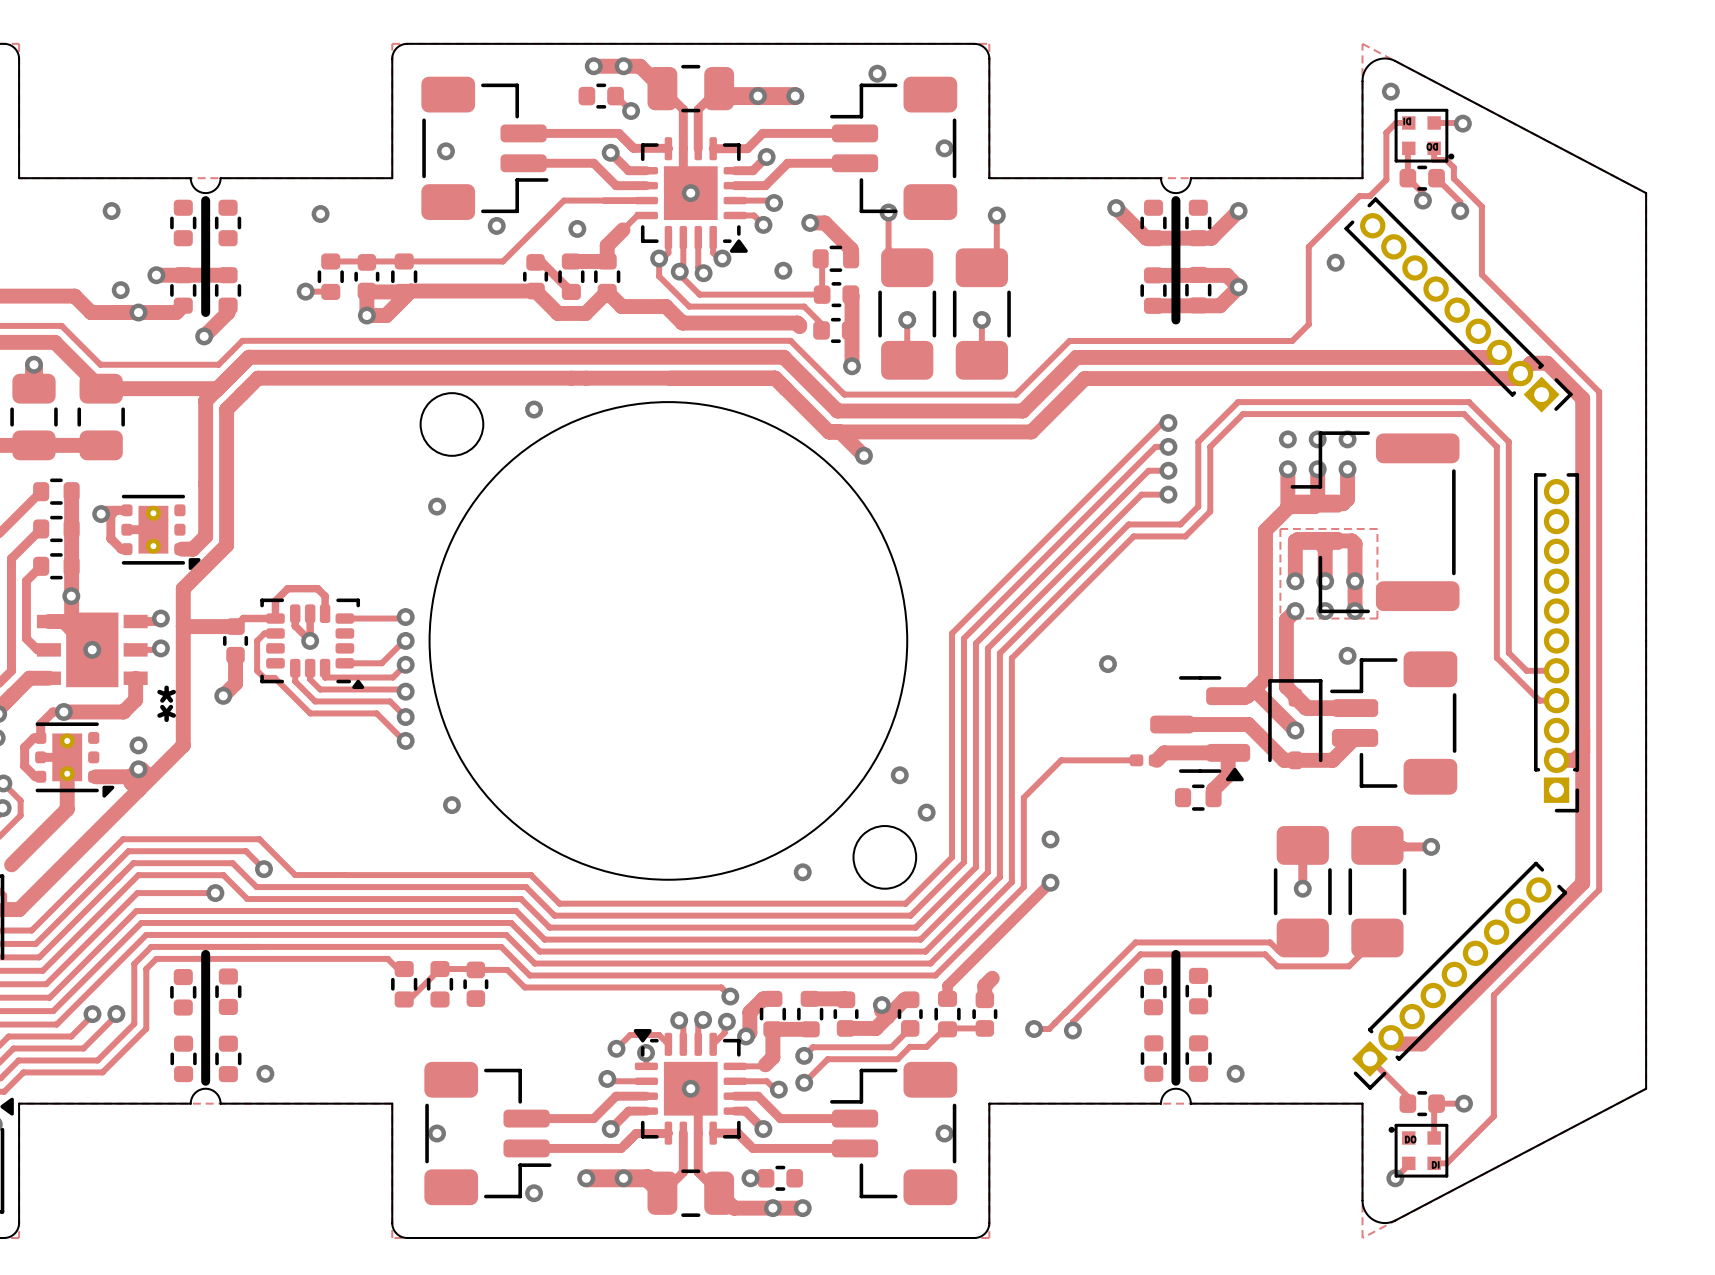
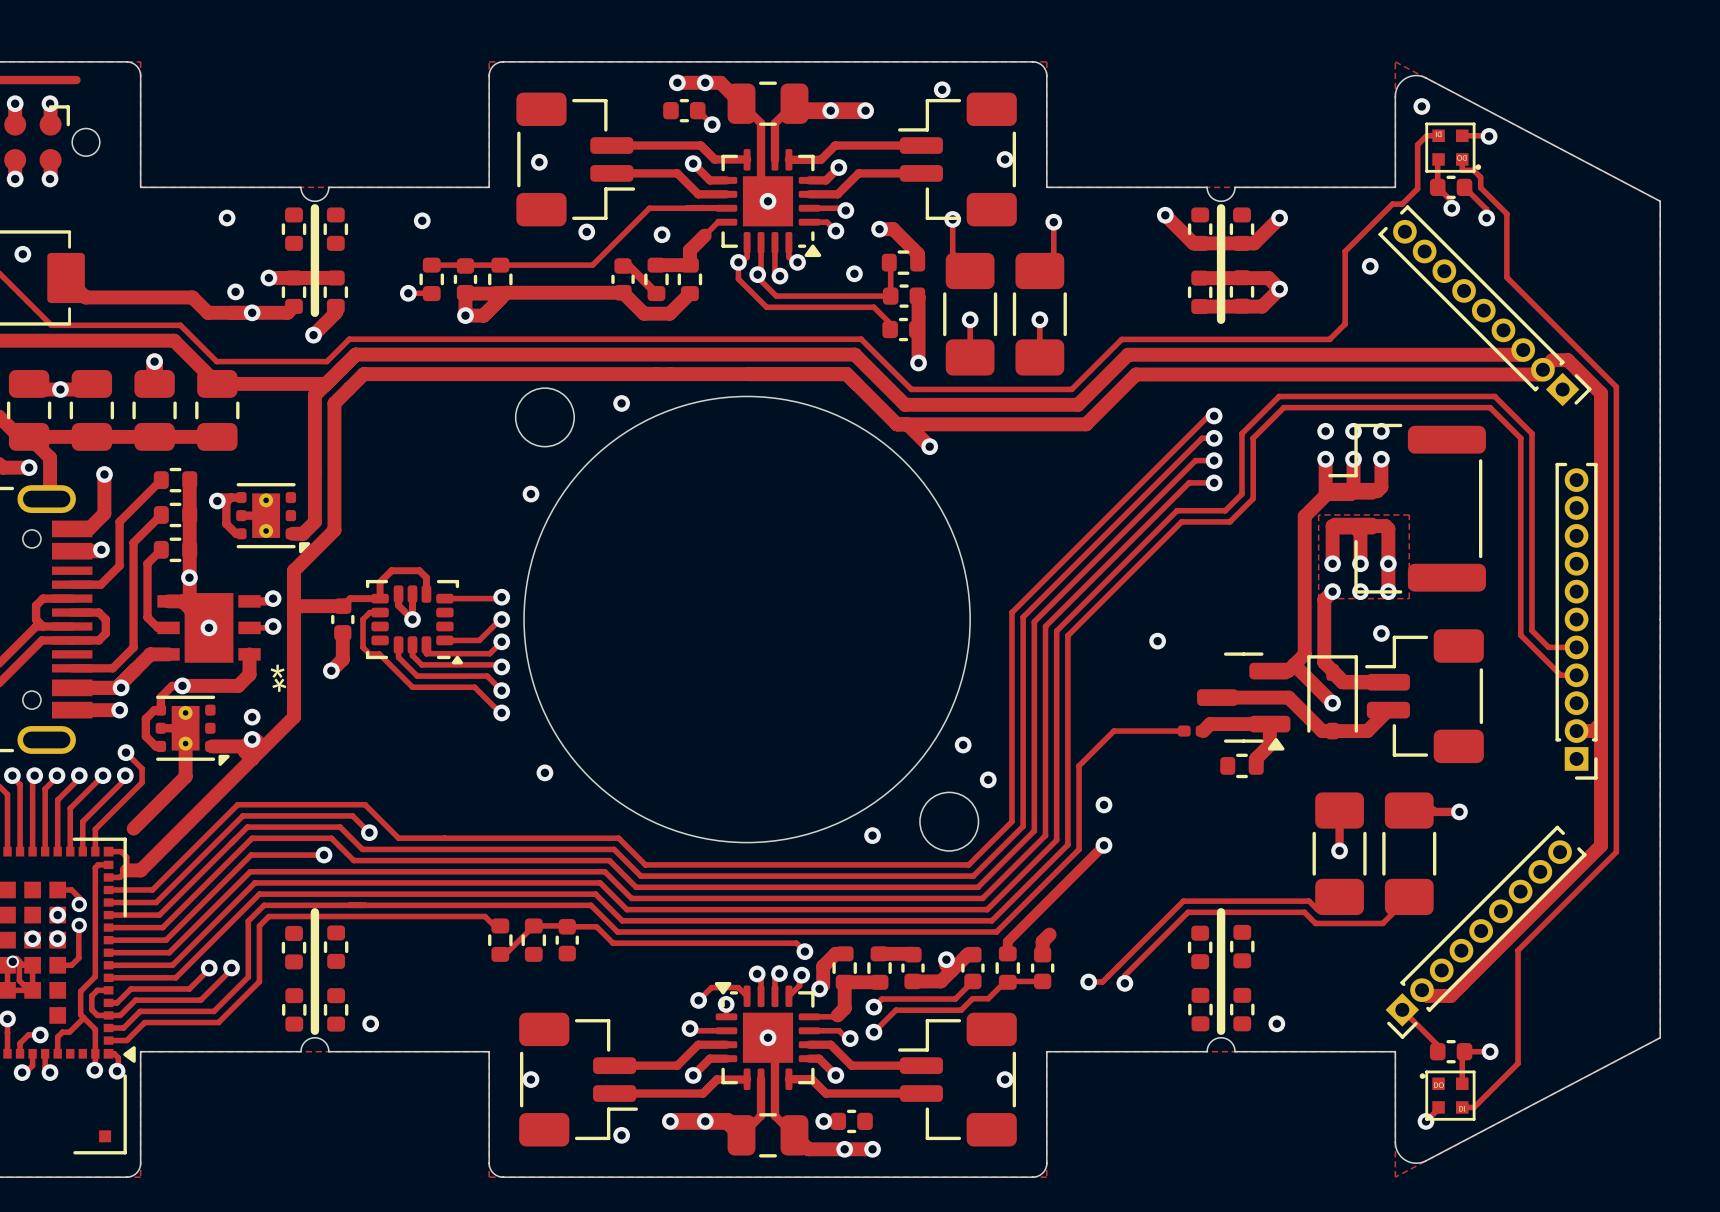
track: (607, 291) (621, 306) (666, 306) (682, 323) (797, 323) (799, 326) -> none

